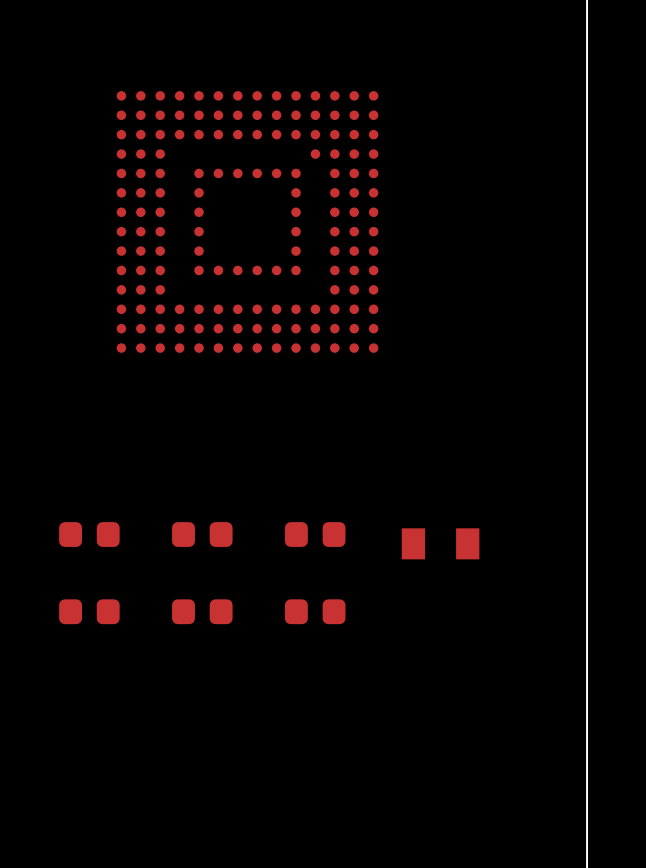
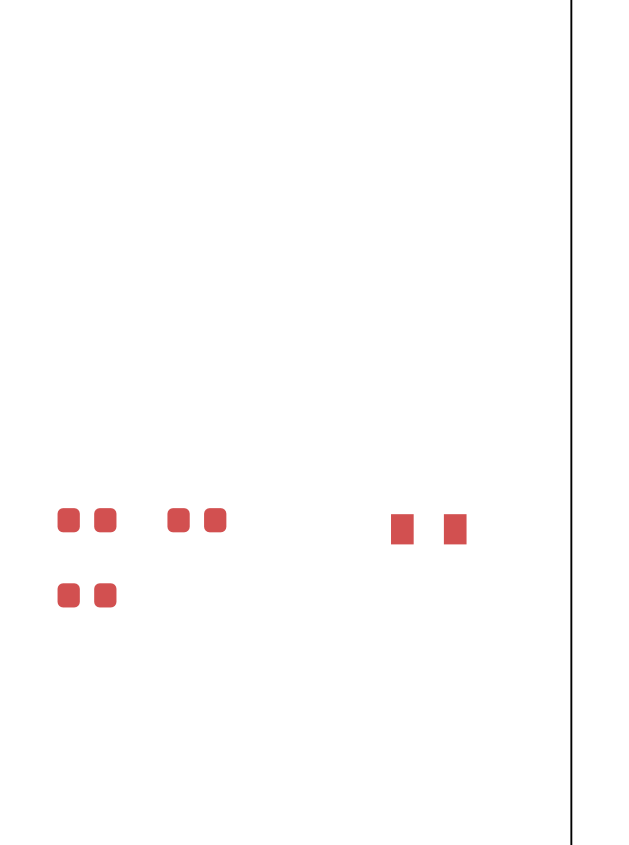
part: (247, 221) -> none
part: (315, 534) -> none
part: (202, 611) -> none
part: (315, 611) -> none

